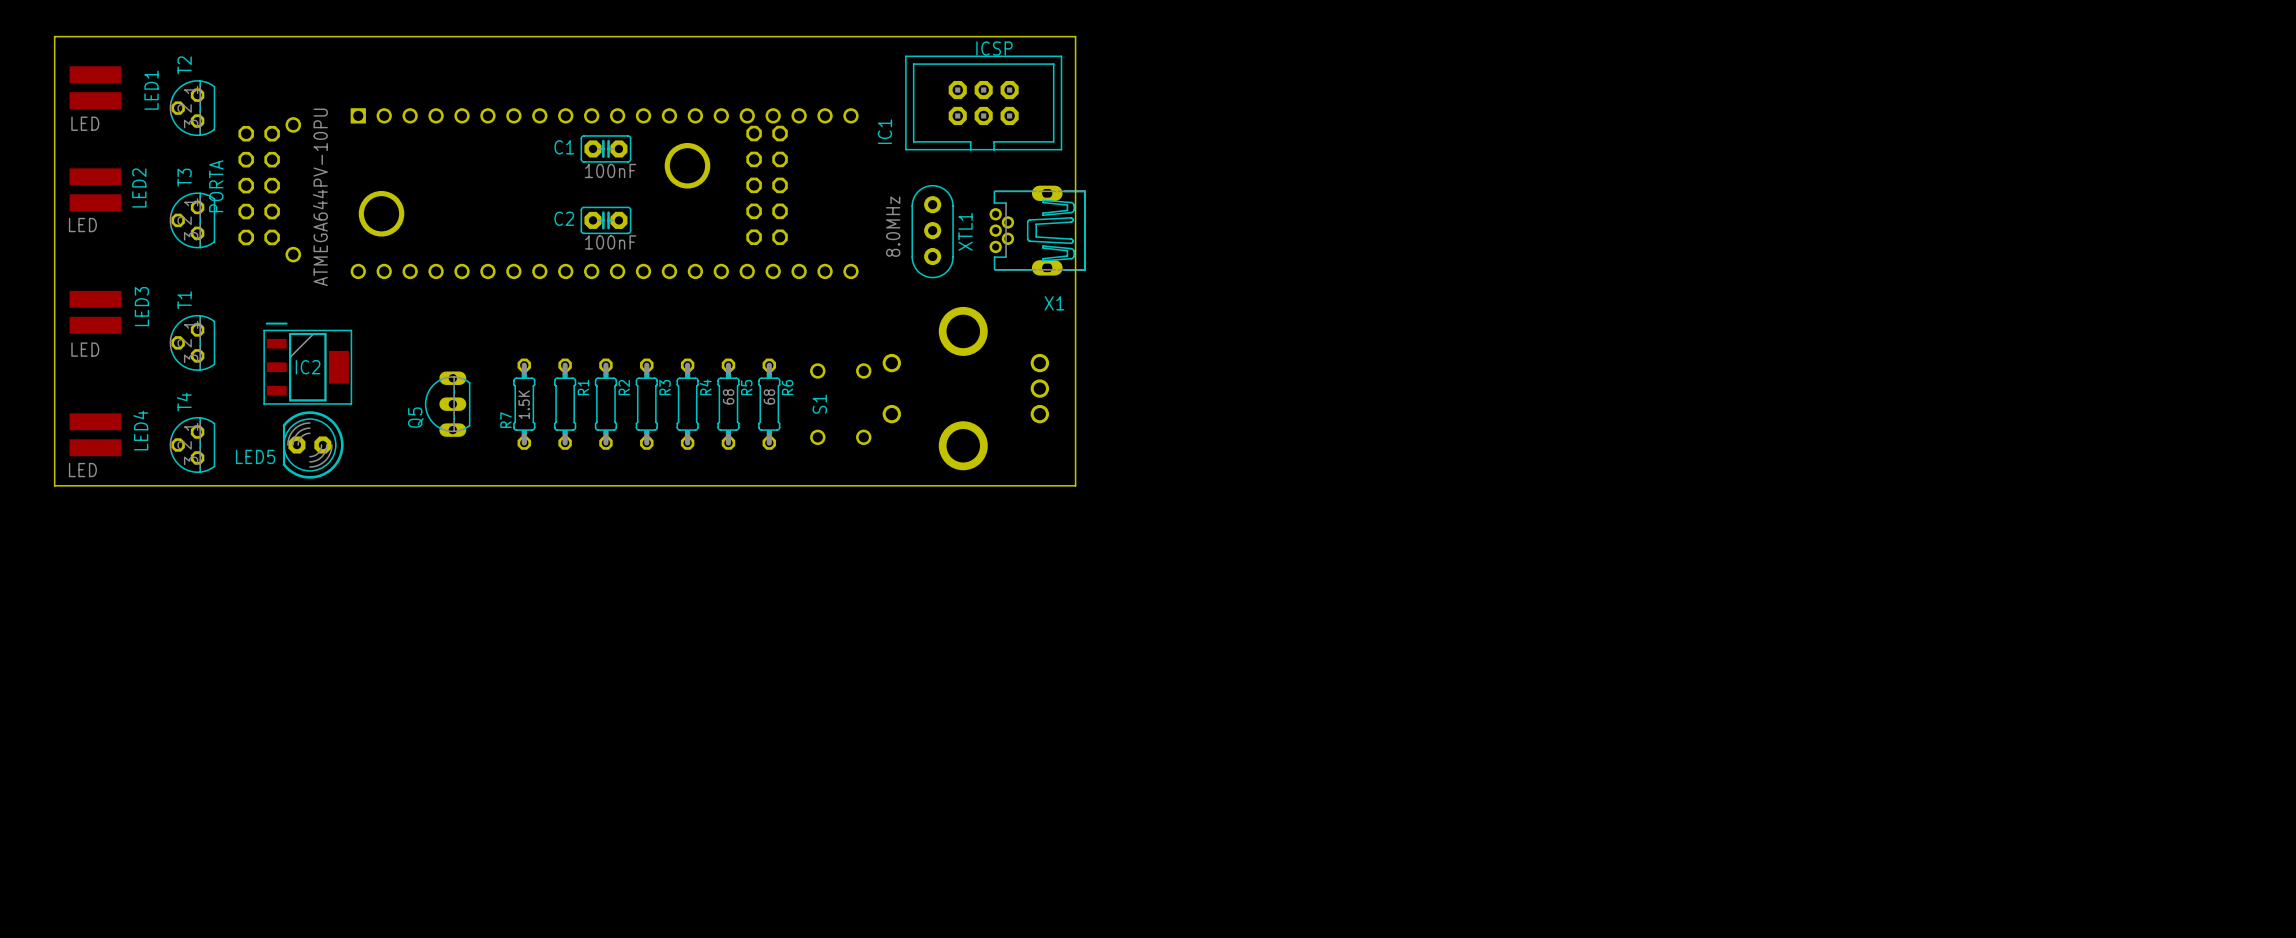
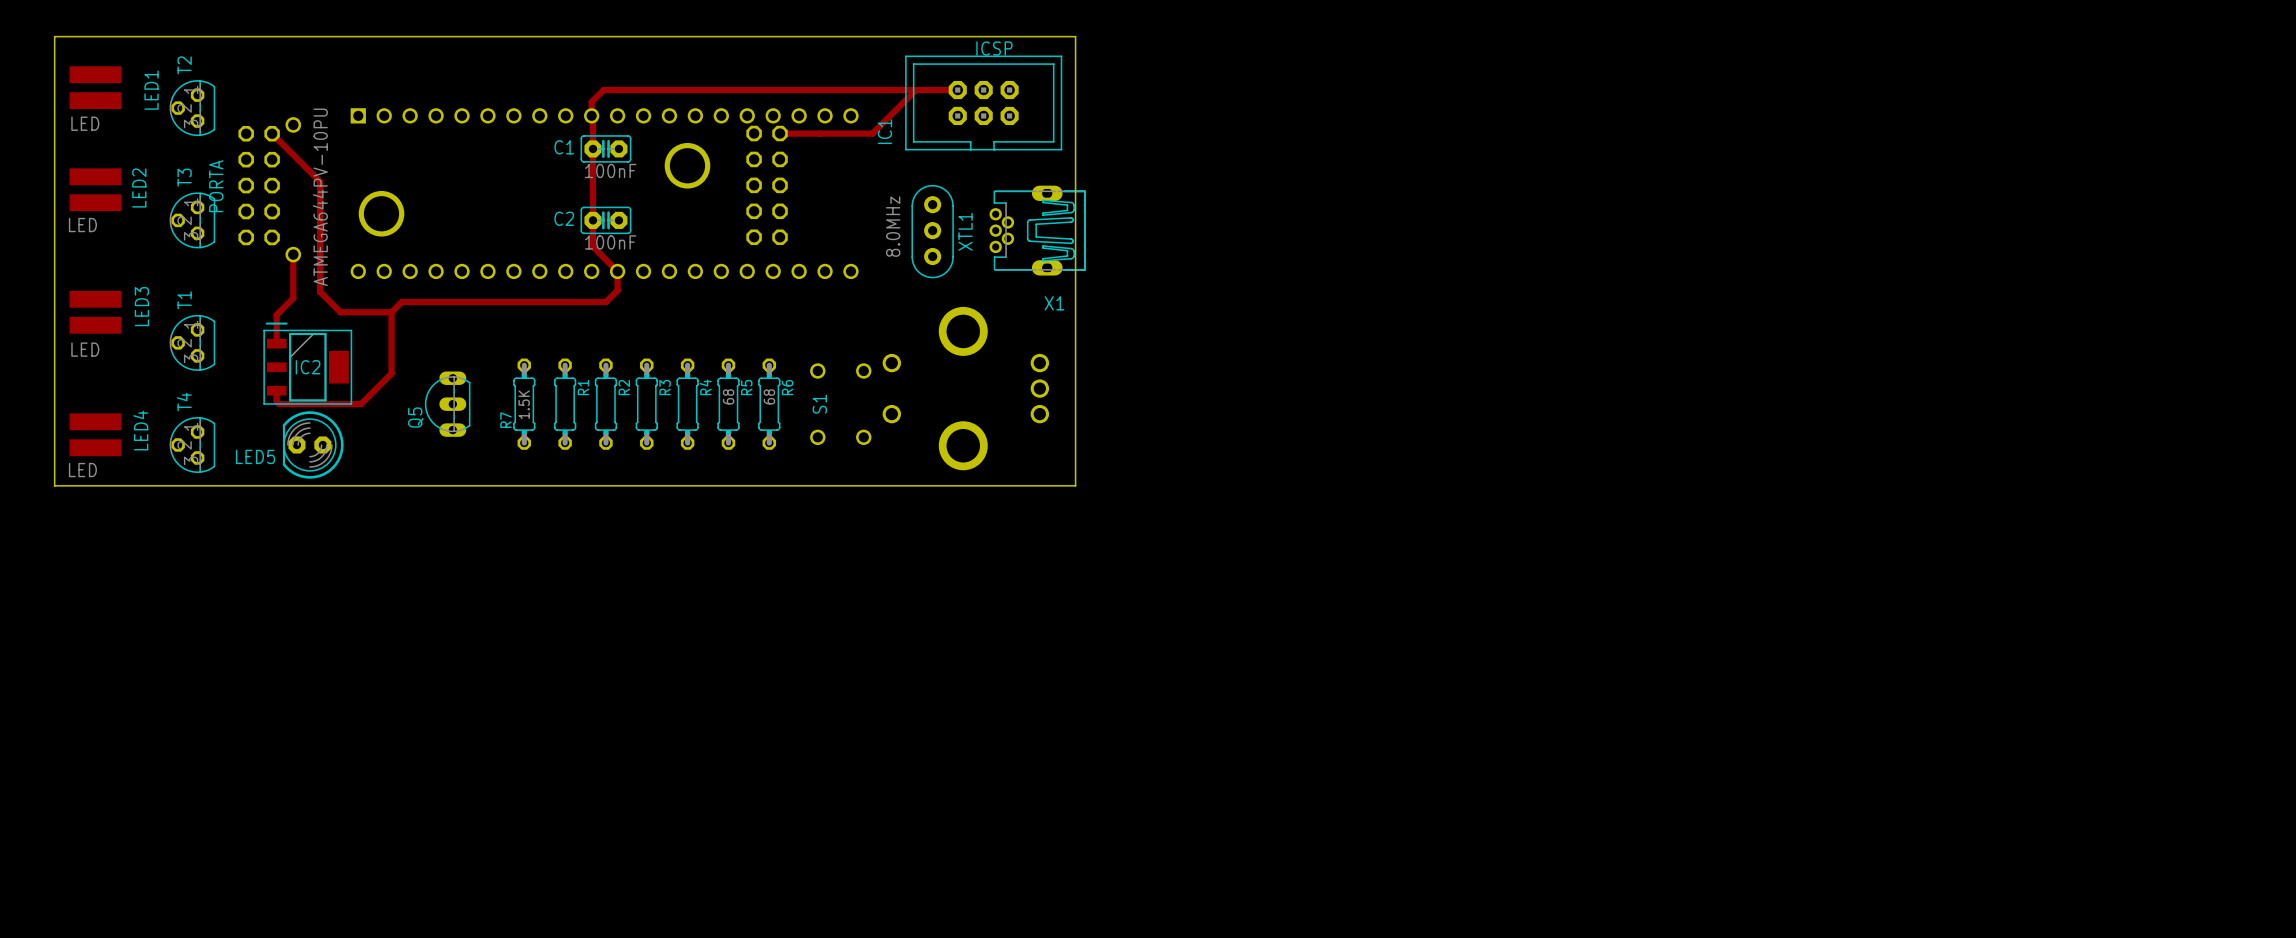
track: none -> (916, 90) (872, 133) (780, 133)
track: none -> (957, 90) (603, 90) (591, 101) (592, 246) (617, 271) (617, 290) (605, 302) (401, 302) (391, 312)
track: none -> (272, 133) (320, 181) (320, 291) (340, 312) (391, 312)
track: none -> (293, 254) (293, 298) (276, 314) (276, 343)
track: none -> (391, 312) (391, 373) (360, 404) (279, 404) (276, 401) (276, 390)

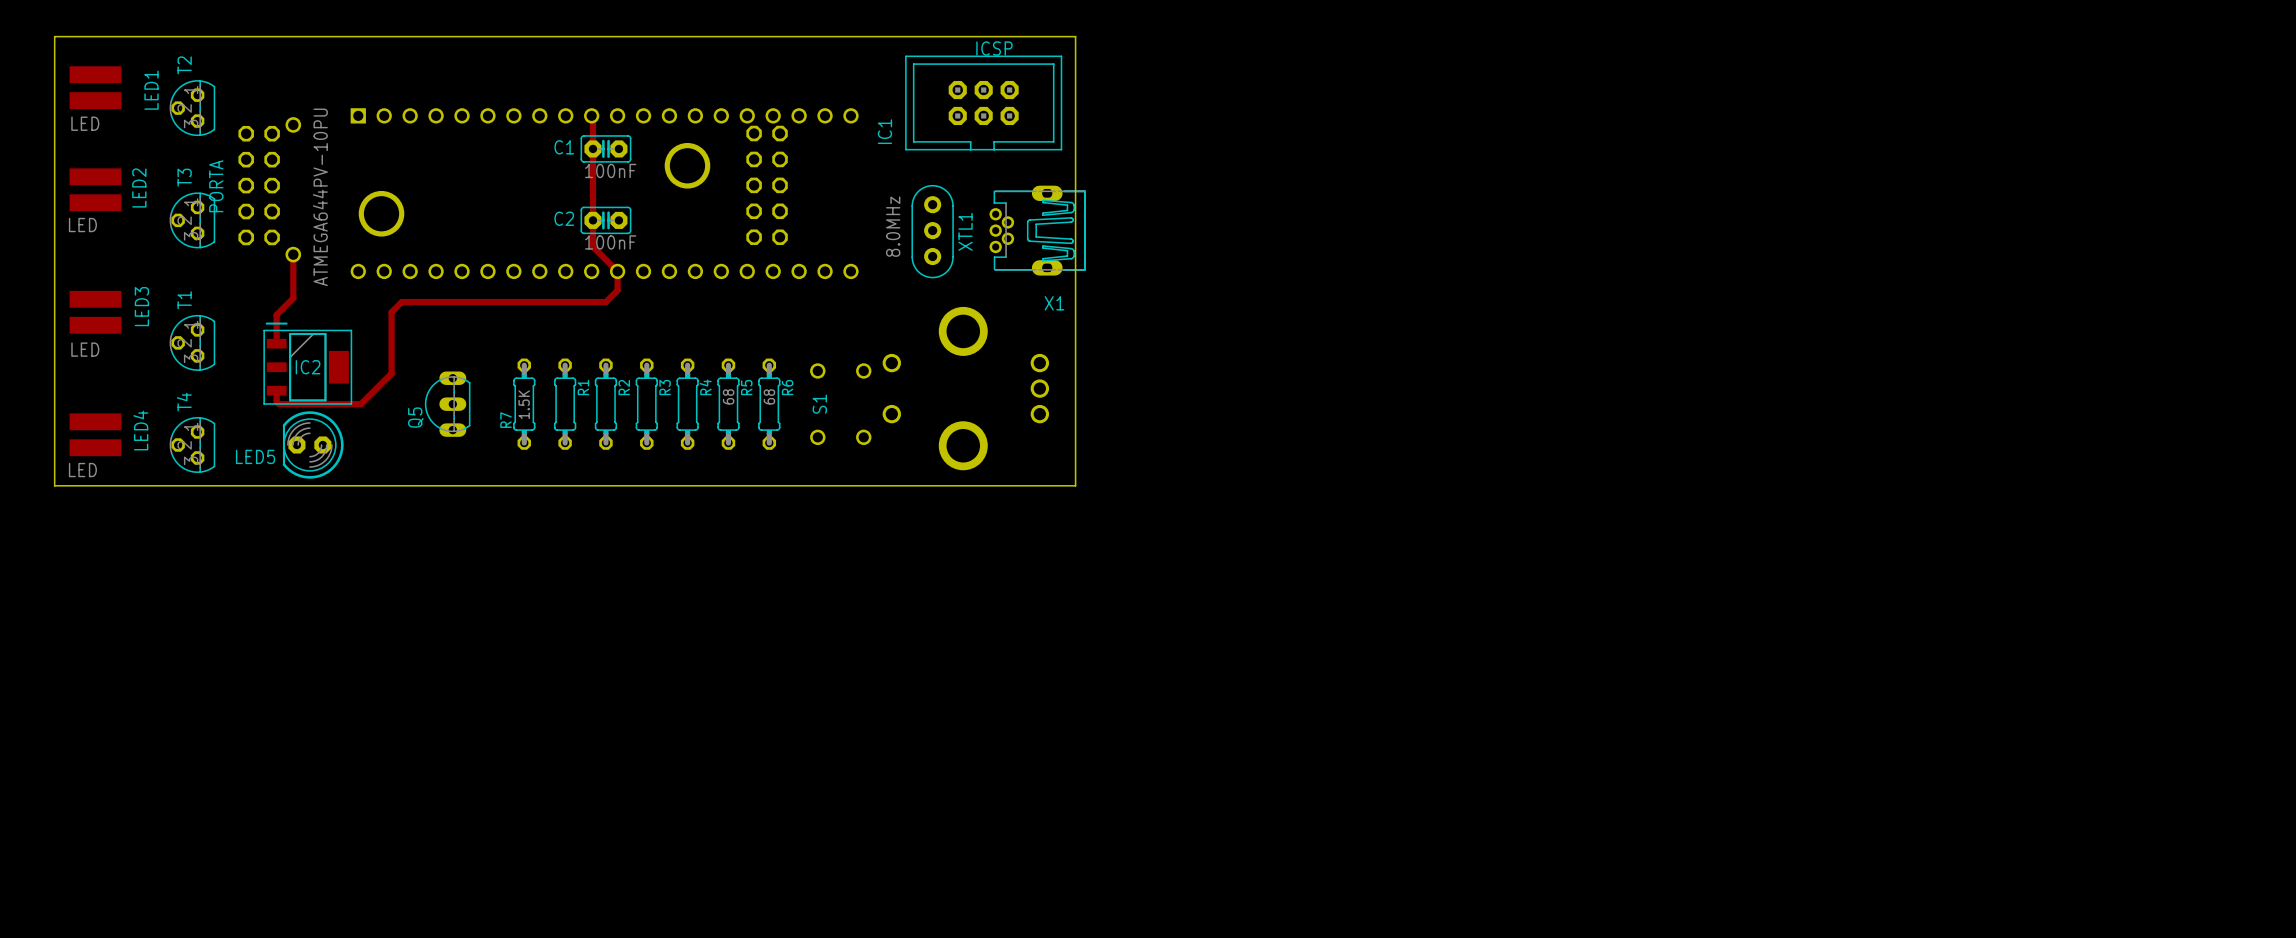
track: (916, 90) (872, 133) (780, 133) -> none
track: (957, 90) (603, 90) (591, 101) (591, 115) -> none
track: (272, 133) (320, 181) (320, 291) (340, 312) (391, 312) -> none

